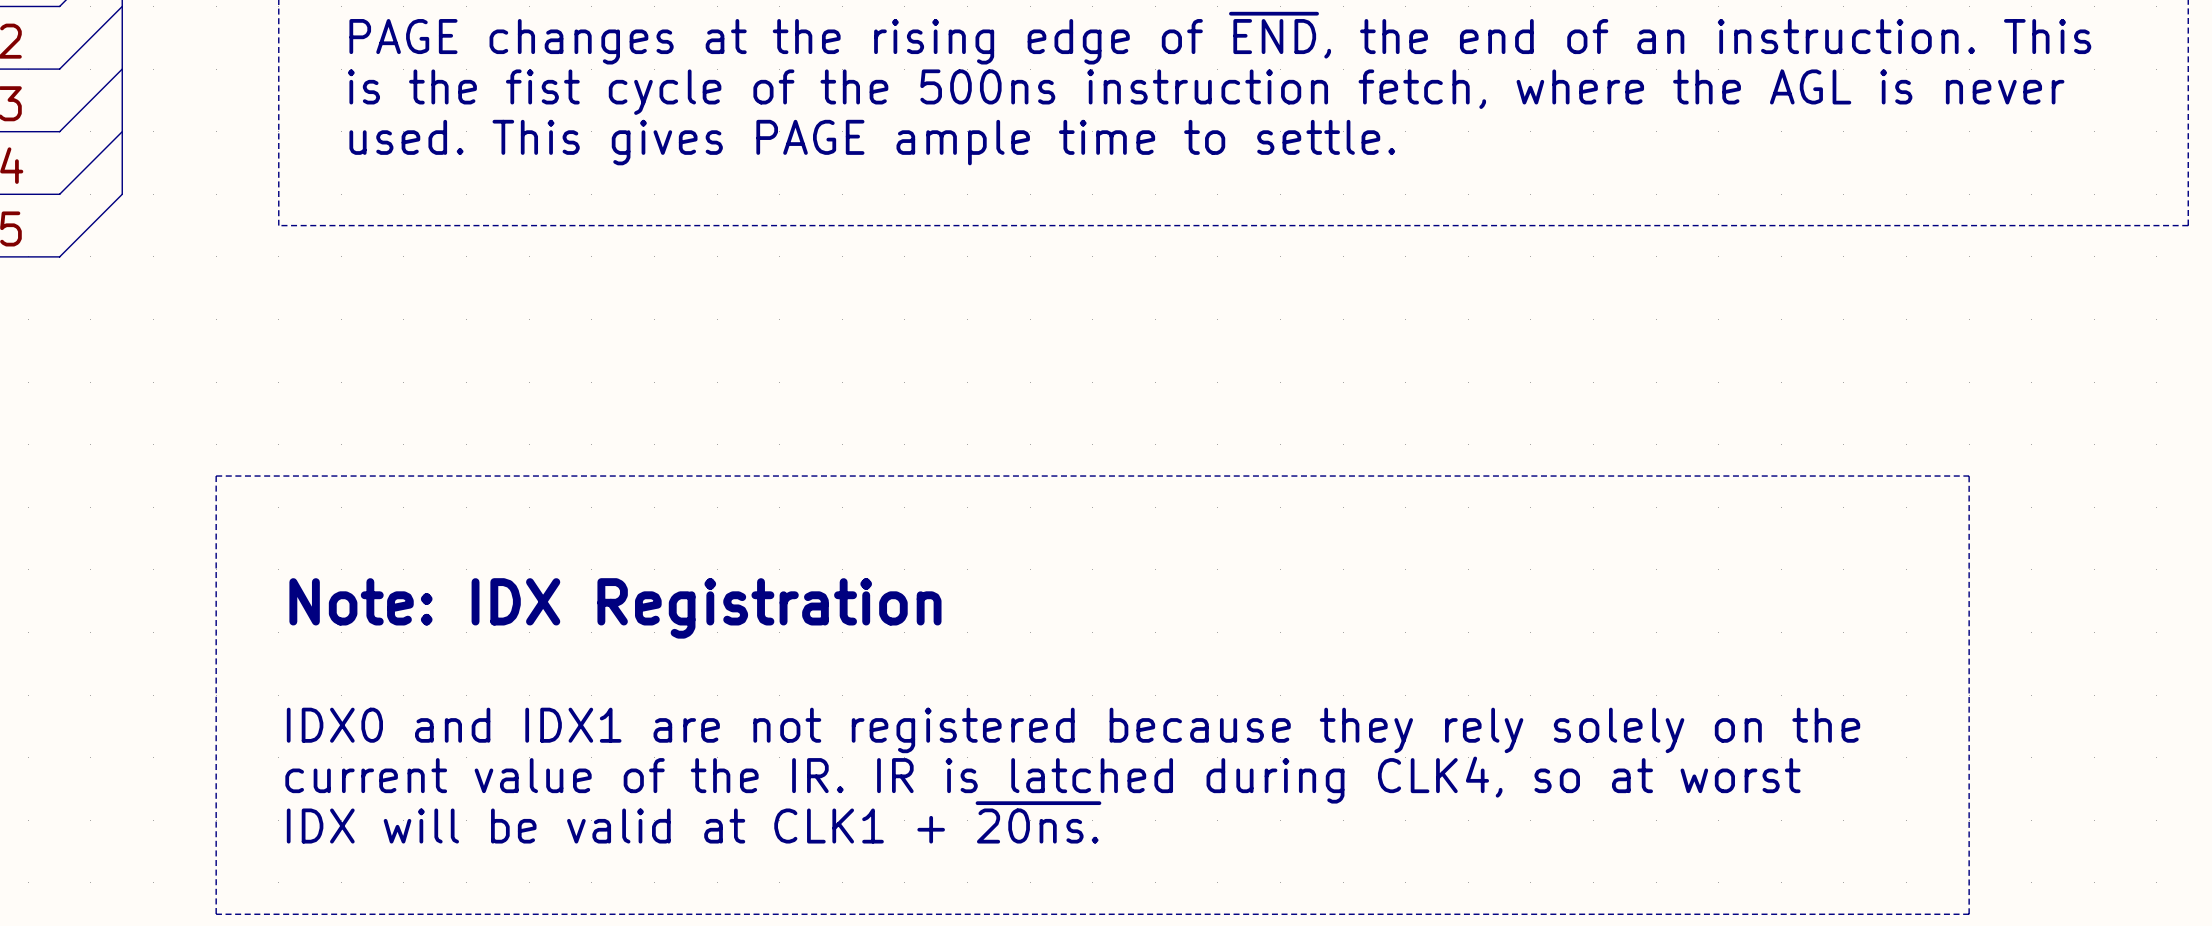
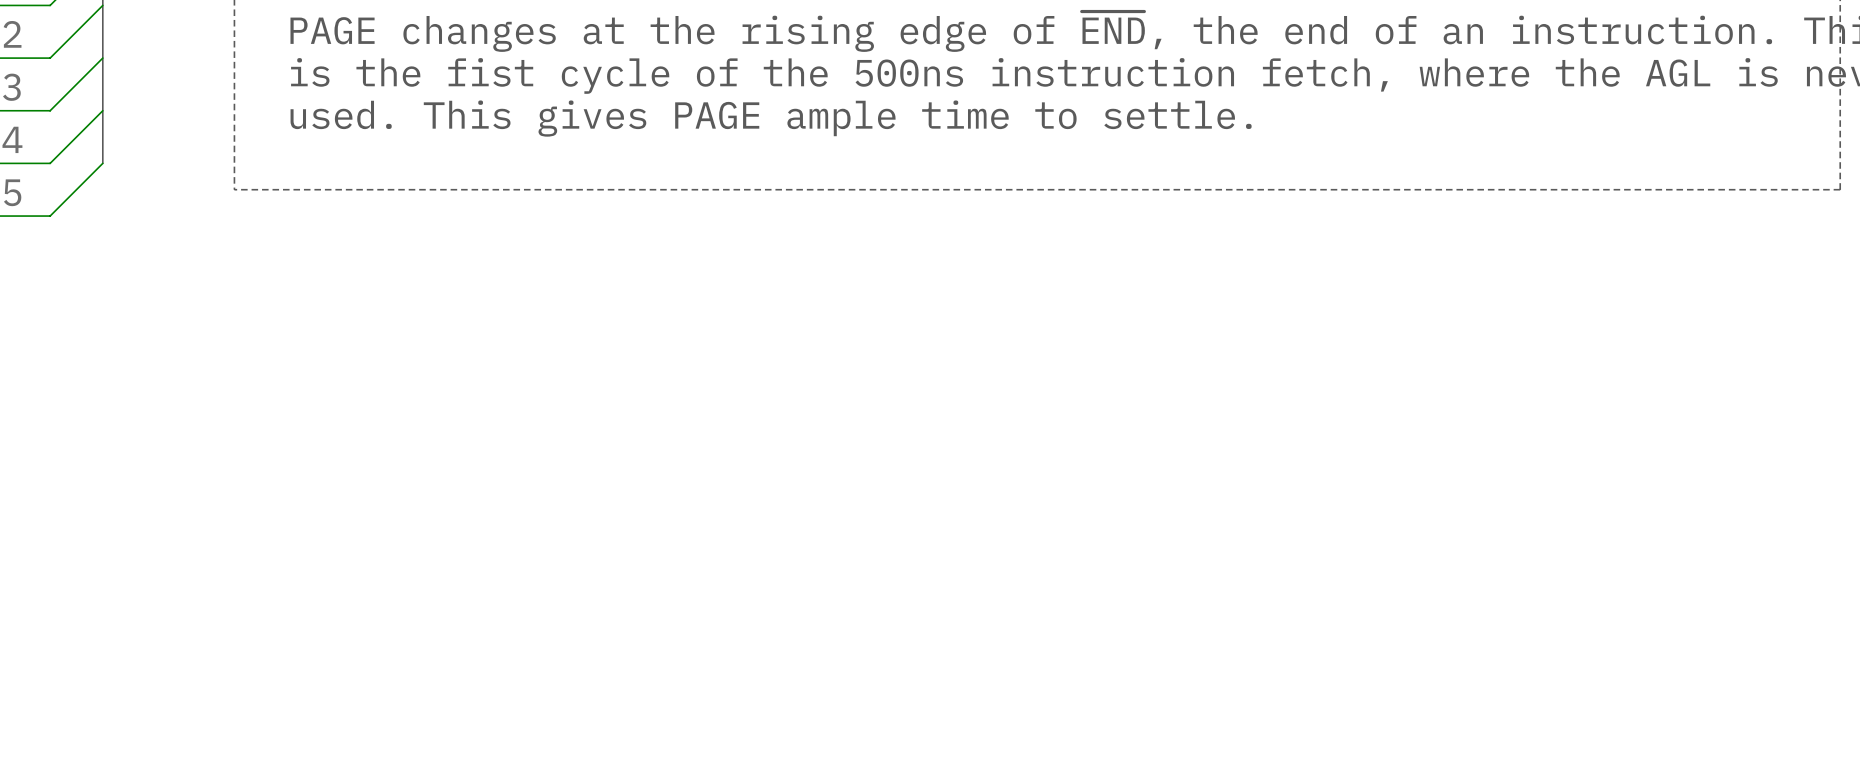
line: (216, 476) (1969, 476) (1969, 914) (216, 914) (216, 476) -> none
text: Note: IDX Registration (615, 608) -> none
text: IDX0 and IDX1 are not registered because they rely solely on the (1073, 730) -> none
text: current value of the IR. IR is latched during CLK4, so at worst (1042, 780) -> none
text: IDX will be valid at CLK1 + ~{20ns.} (694, 822) -> none

